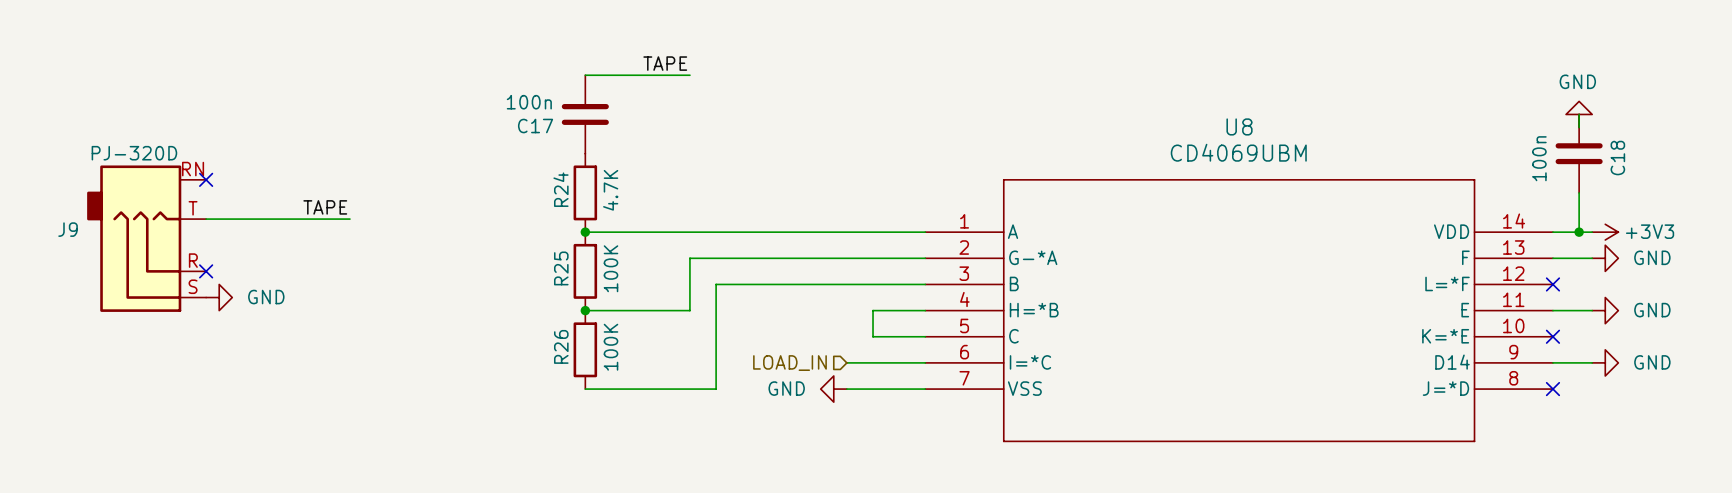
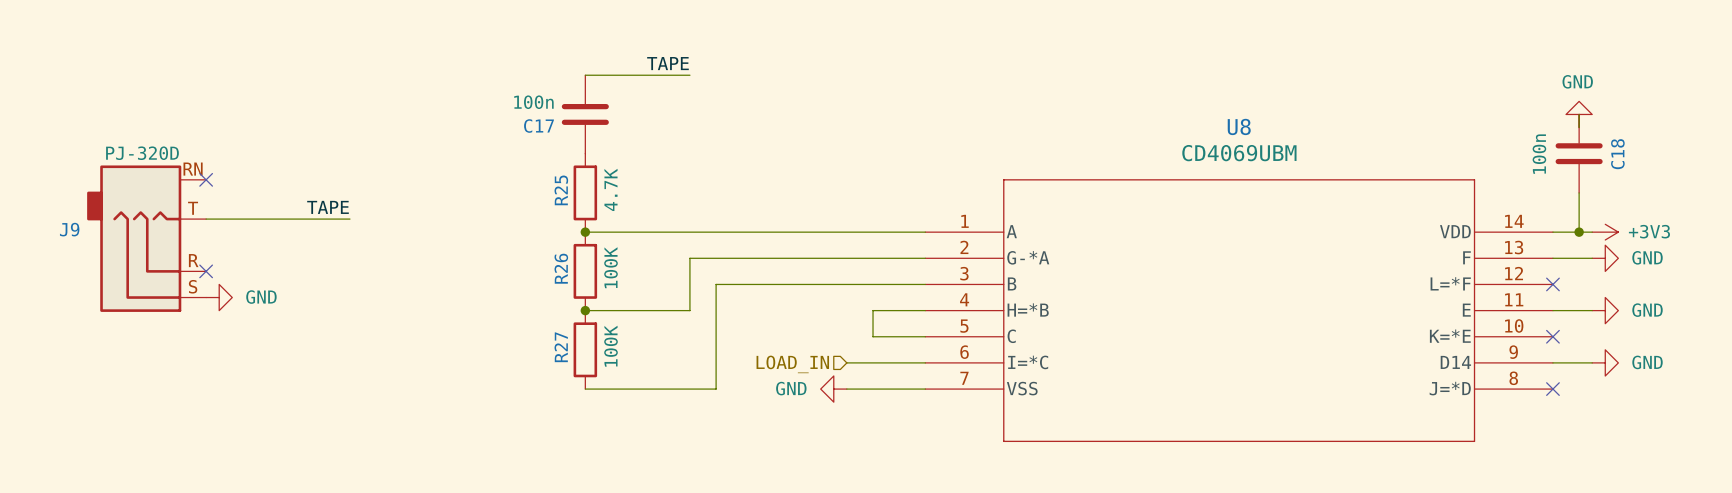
R24 name: R24 (561, 189) -> R25 (561, 190)
R25 name: R25 (561, 268) -> R26 (561, 268)
R26 name: R26 (561, 346) -> R27 (561, 347)

